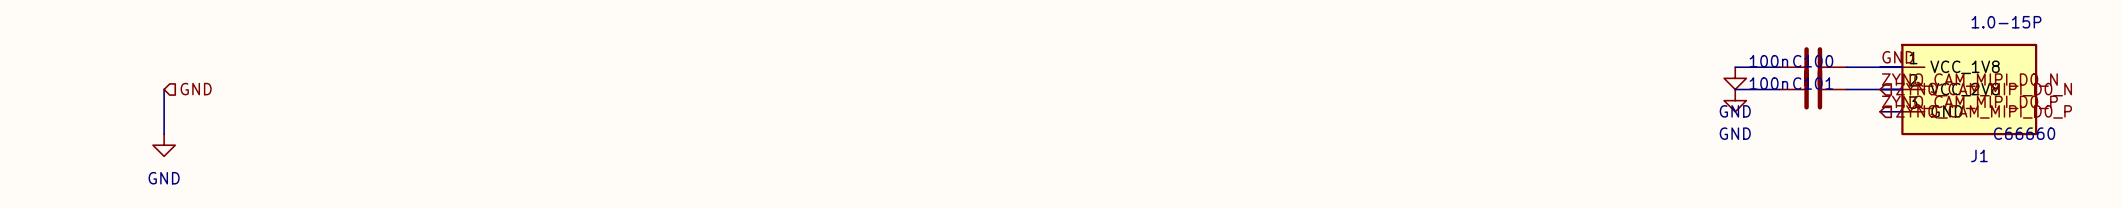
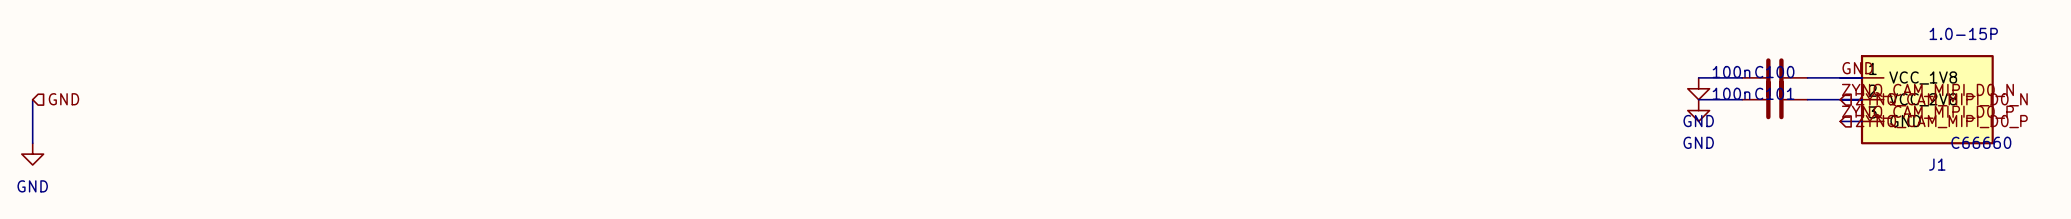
wire: (164, 89) (164, 134) -> (32, 99) (32, 143)
hierarchical label position: GND (196, 89) -> GND (63, 99)
power symbol position: GND (164, 145) -> GND (32, 154)

